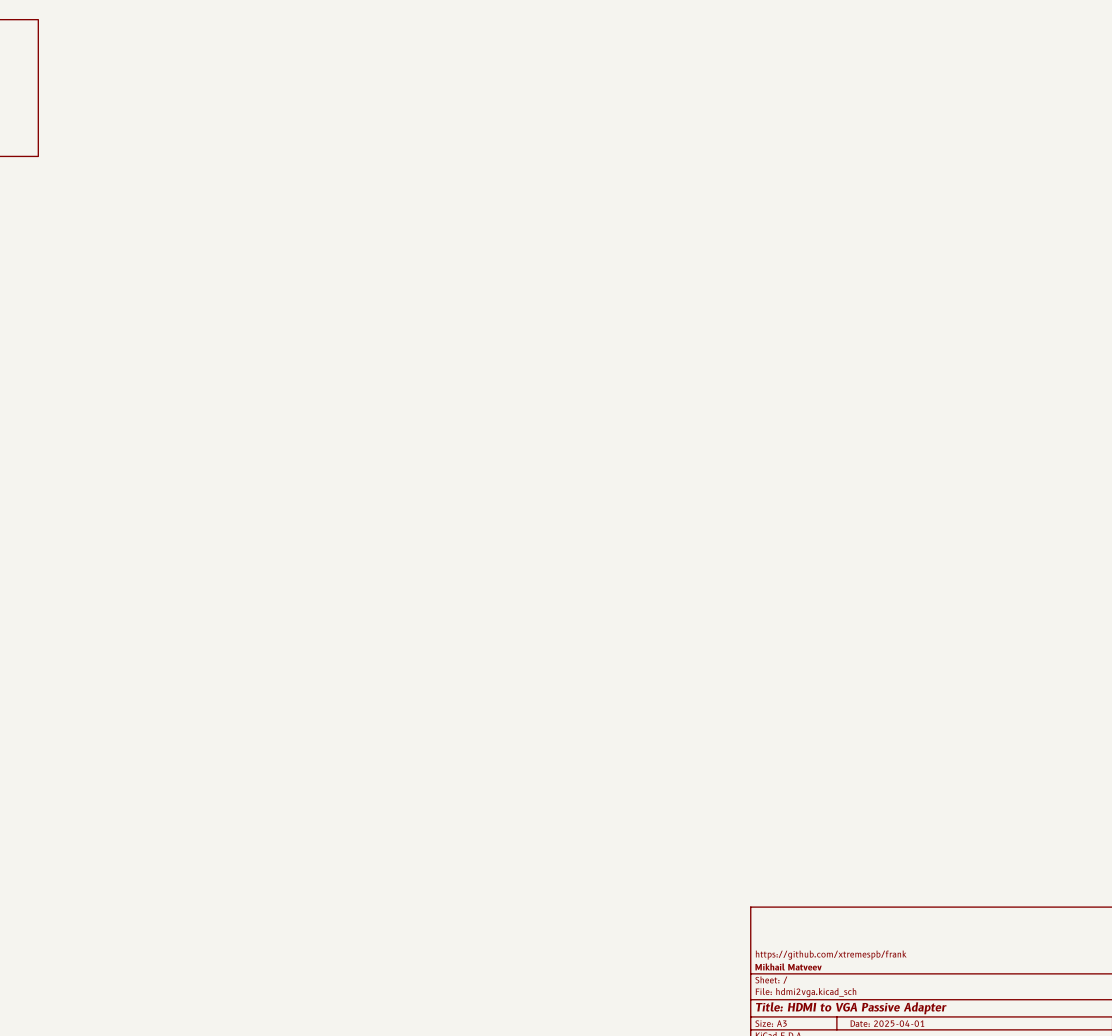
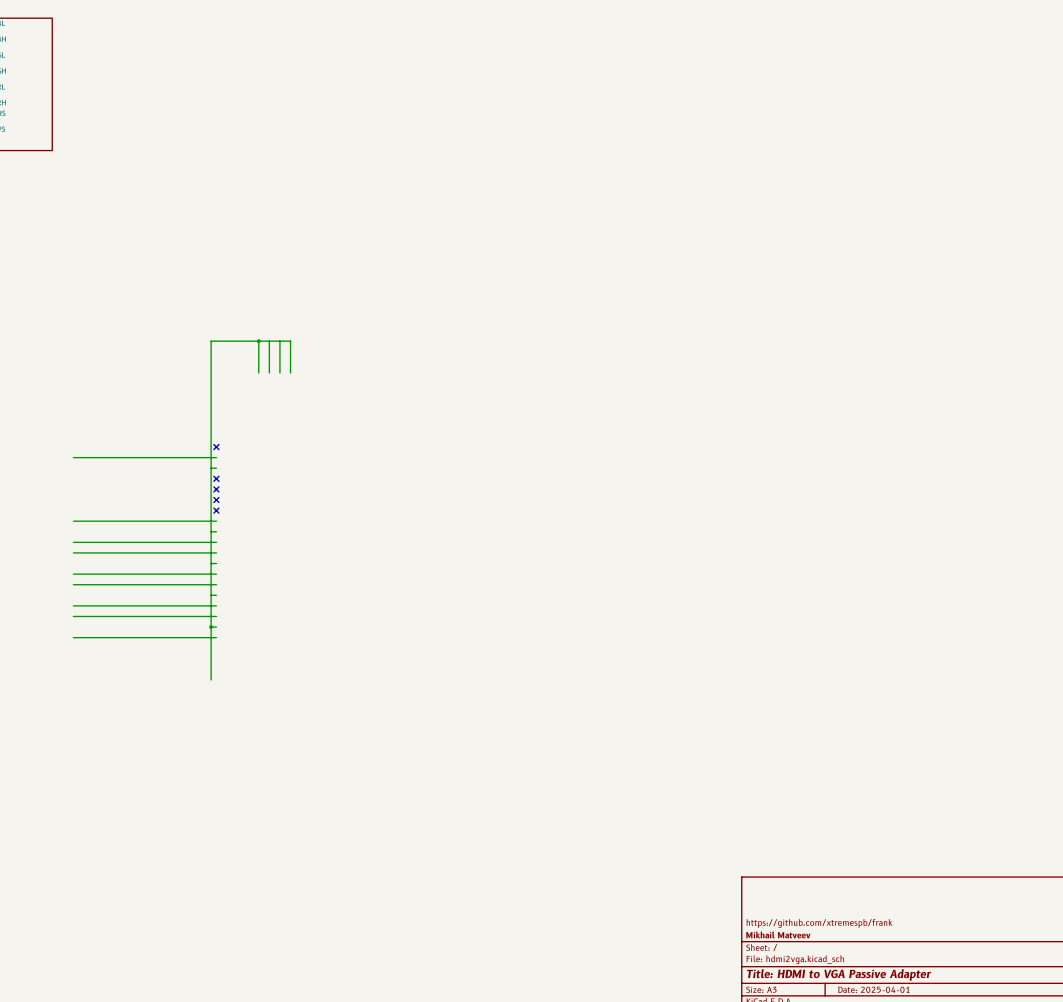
wire: none -> (258, 341) (258, 372)
junction: none -> (258, 341)
wire: none -> (269, 341) (269, 372)
wire: none -> (279, 341) (279, 372)
wire: none -> (290, 372) (290, 341) (211, 341) (211, 680)
no-connect mark: none -> (216, 447)
wire: none -> (73, 457) (216, 457)
wire: none -> (211, 468) (216, 468)
no-connect mark: none -> (216, 478)
no-connect mark: none -> (216, 489)
no-connect mark: none -> (216, 500)
no-connect mark: none -> (216, 510)
wire: none -> (73, 521) (216, 521)
wire: none -> (211, 531) (216, 531)
wire: none -> (73, 542) (216, 542)
wire: none -> (73, 552) (216, 552)
wire: none -> (211, 563) (216, 563)
wire: none -> (73, 574) (216, 574)
wire: none -> (73, 584) (216, 584)
wire: none -> (211, 595) (216, 595)
wire: none -> (73, 605) (216, 605)
wire: none -> (73, 616) (216, 616)
wire: none -> (211, 627) (216, 627)
junction: none -> (211, 627)
wire: none -> (73, 637) (216, 637)

